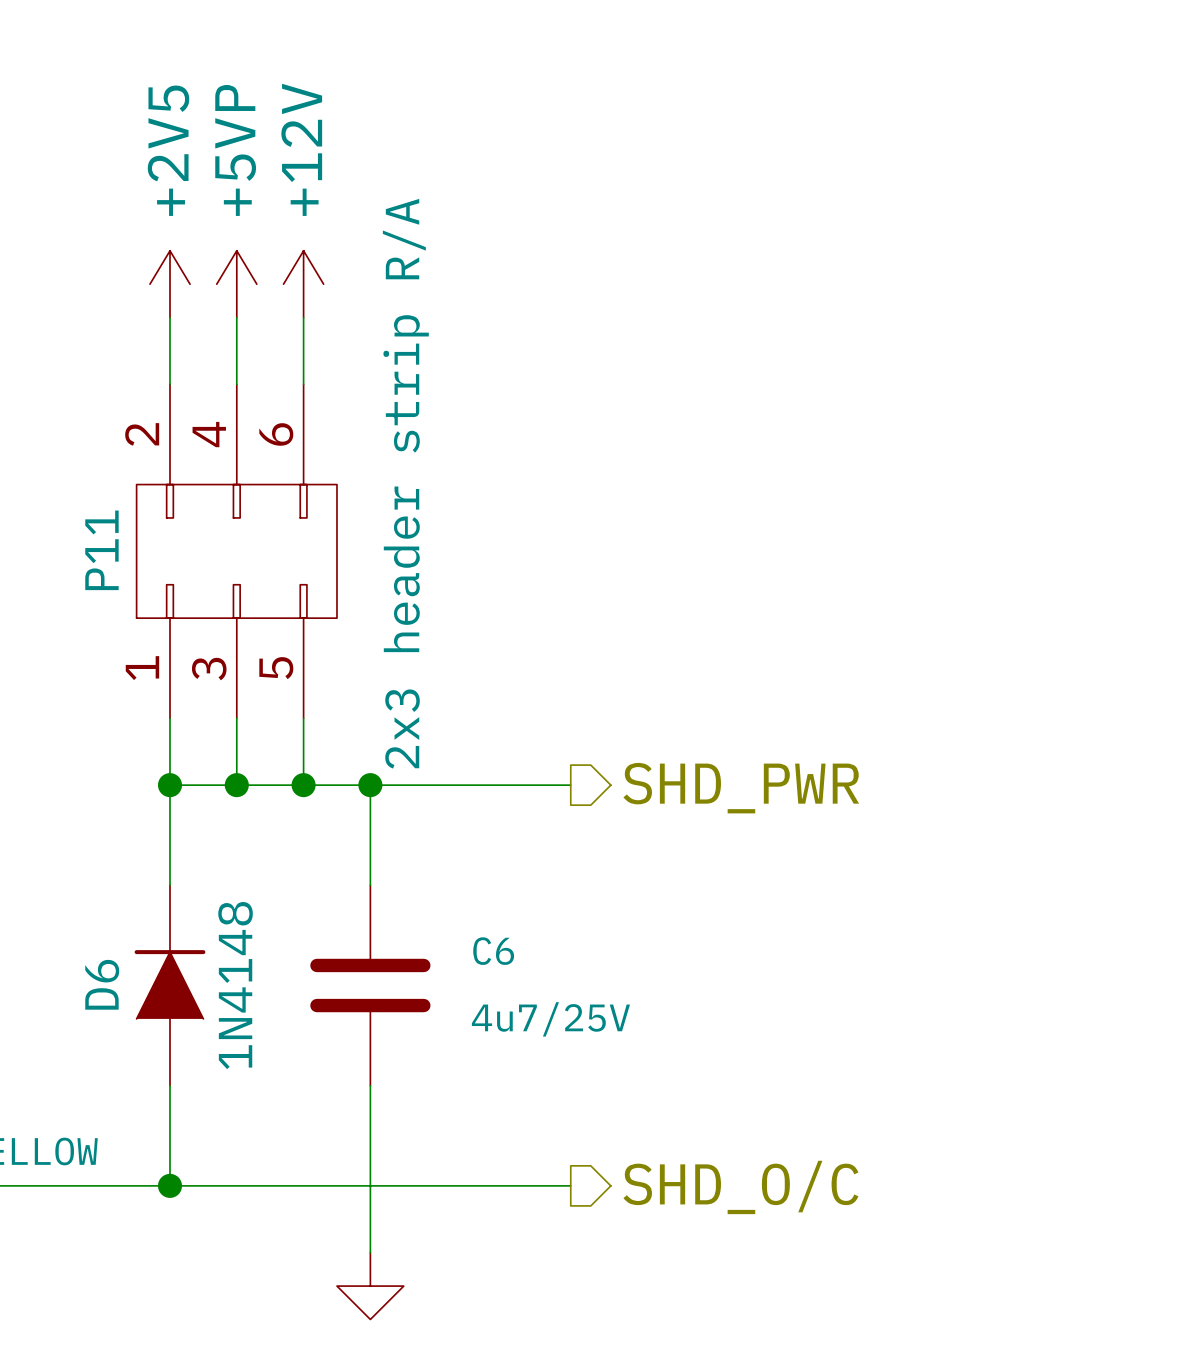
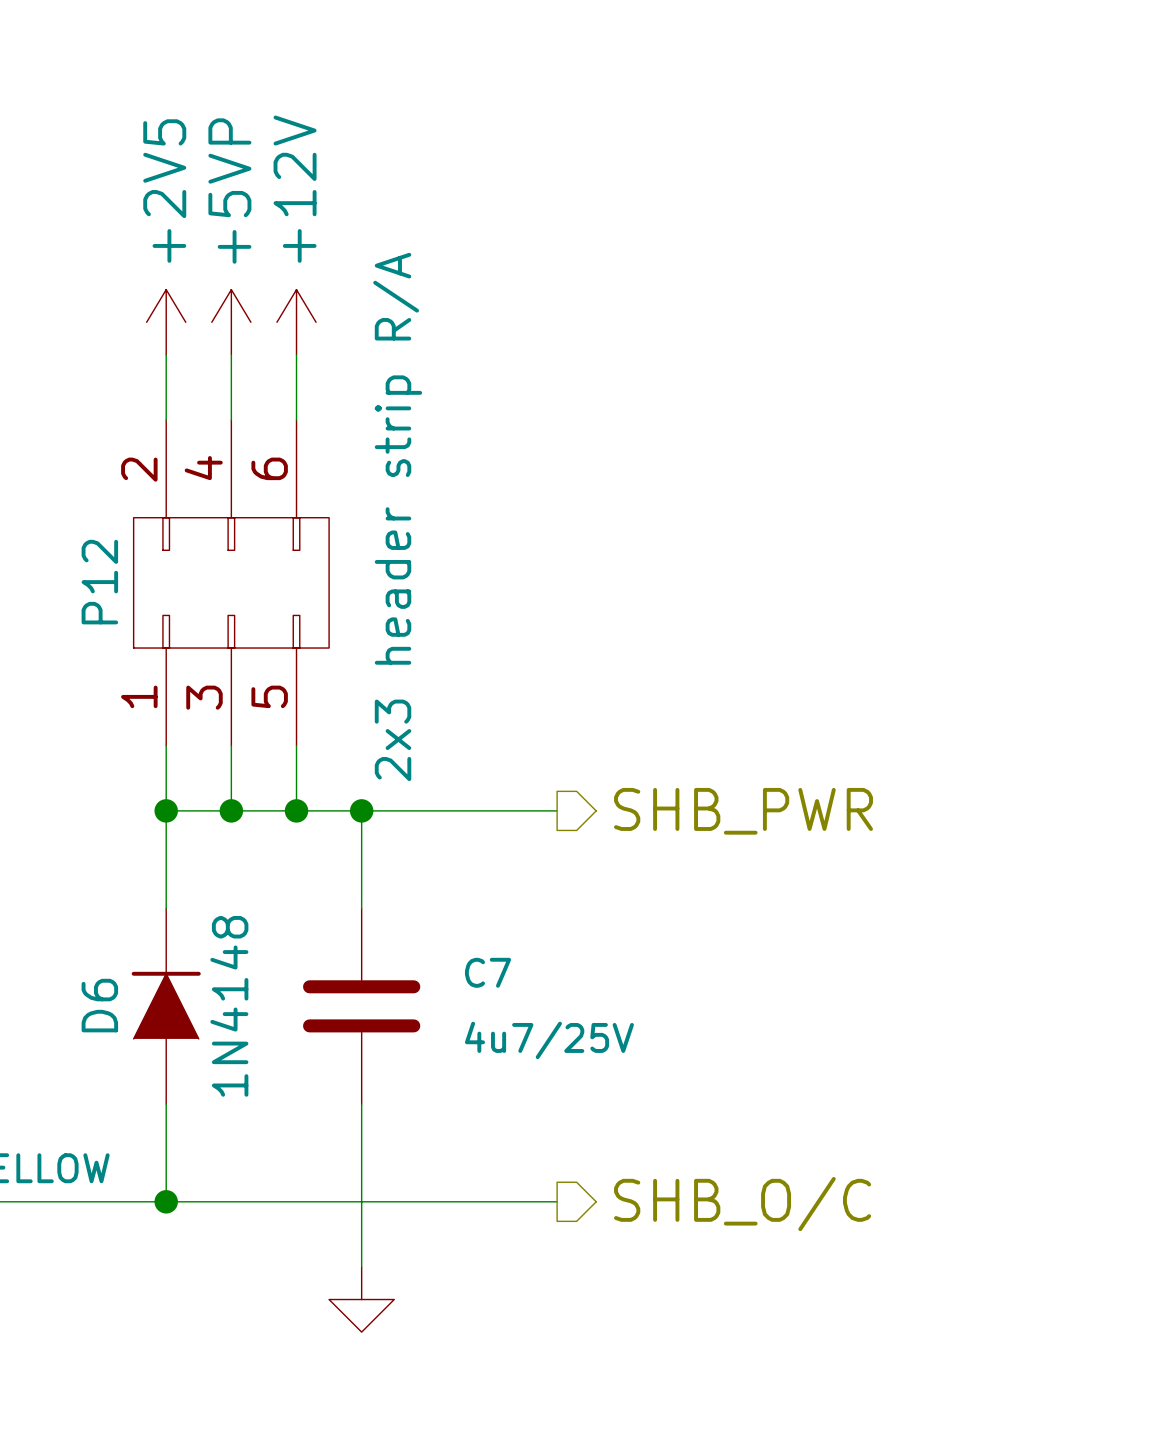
P11 name: P11 (101, 550) -> P12 (99, 582)
hierarchical label: SHD_PWR (741, 788) -> SHB_PWR (743, 811)
C6 name: C6 (493, 951) -> C7 (488, 972)
hierarchical label: SHD_O/C (740, 1187) -> SHB_O/C (742, 1204)

